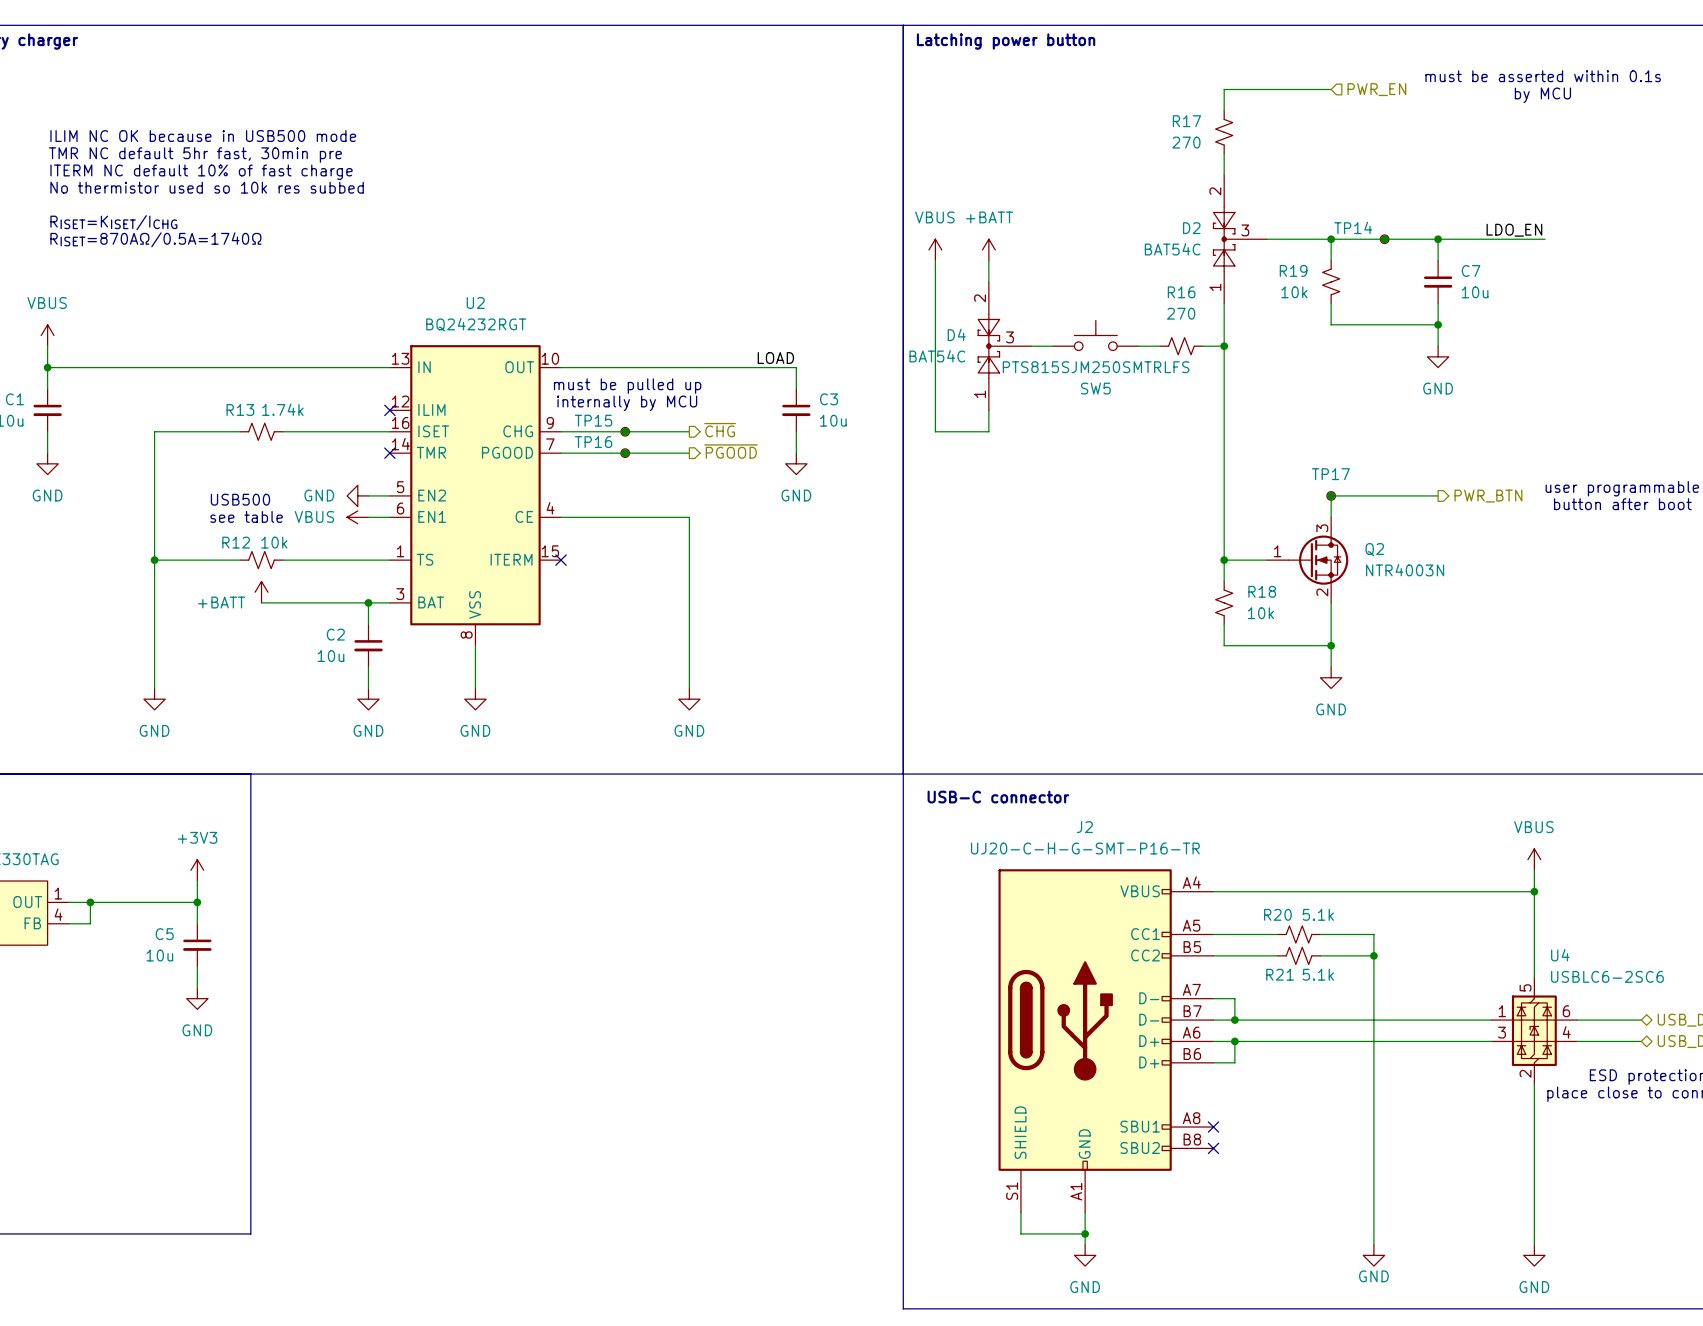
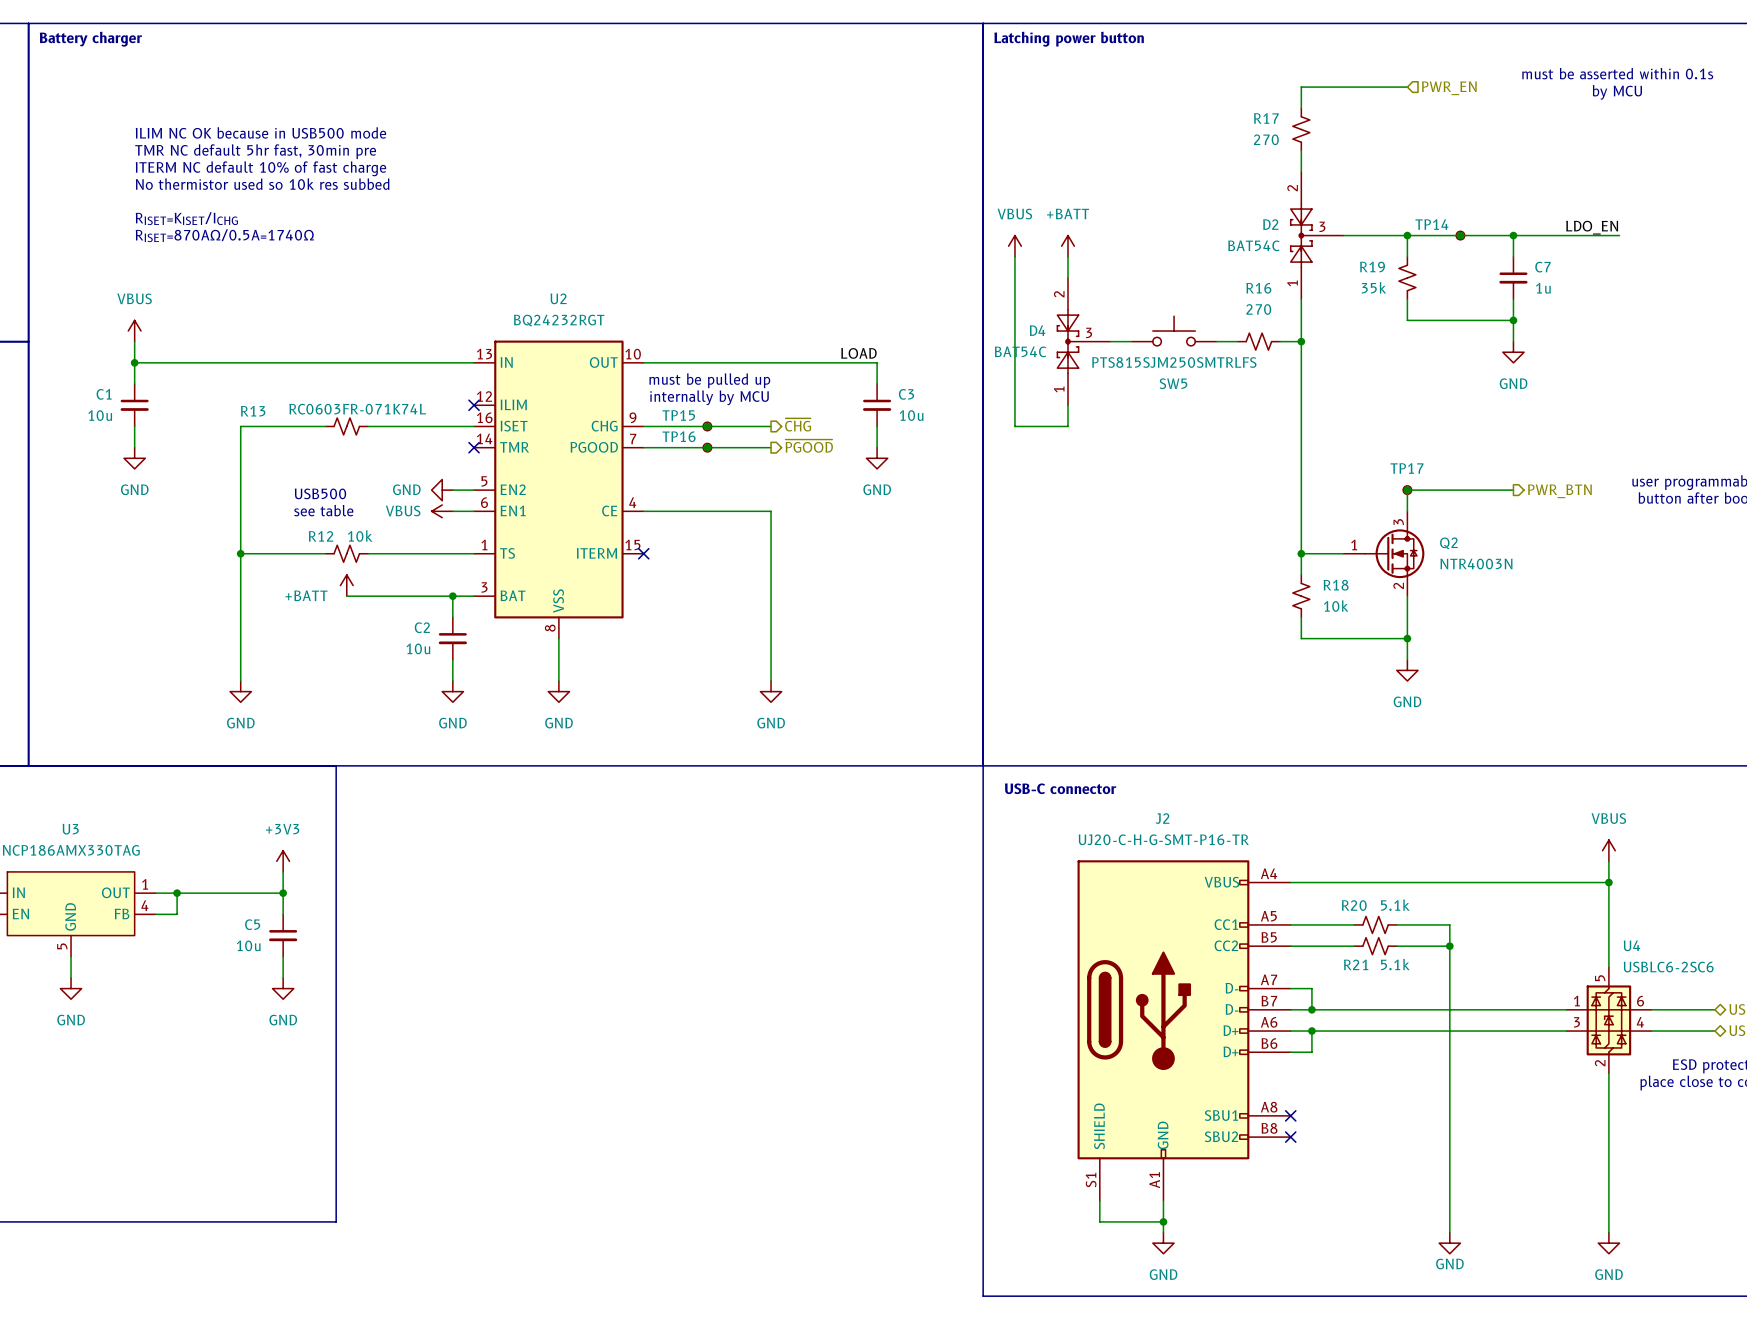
R19 value: 10k (1294, 292) -> 35k (1373, 287)
C7 value: 10u (1475, 292) -> 1u (1543, 288)
R13 name position: R13 (240, 409) -> R13 (253, 411)
R13 value: 1.74k (282, 409) -> RC0603FR-071K74L (357, 409)

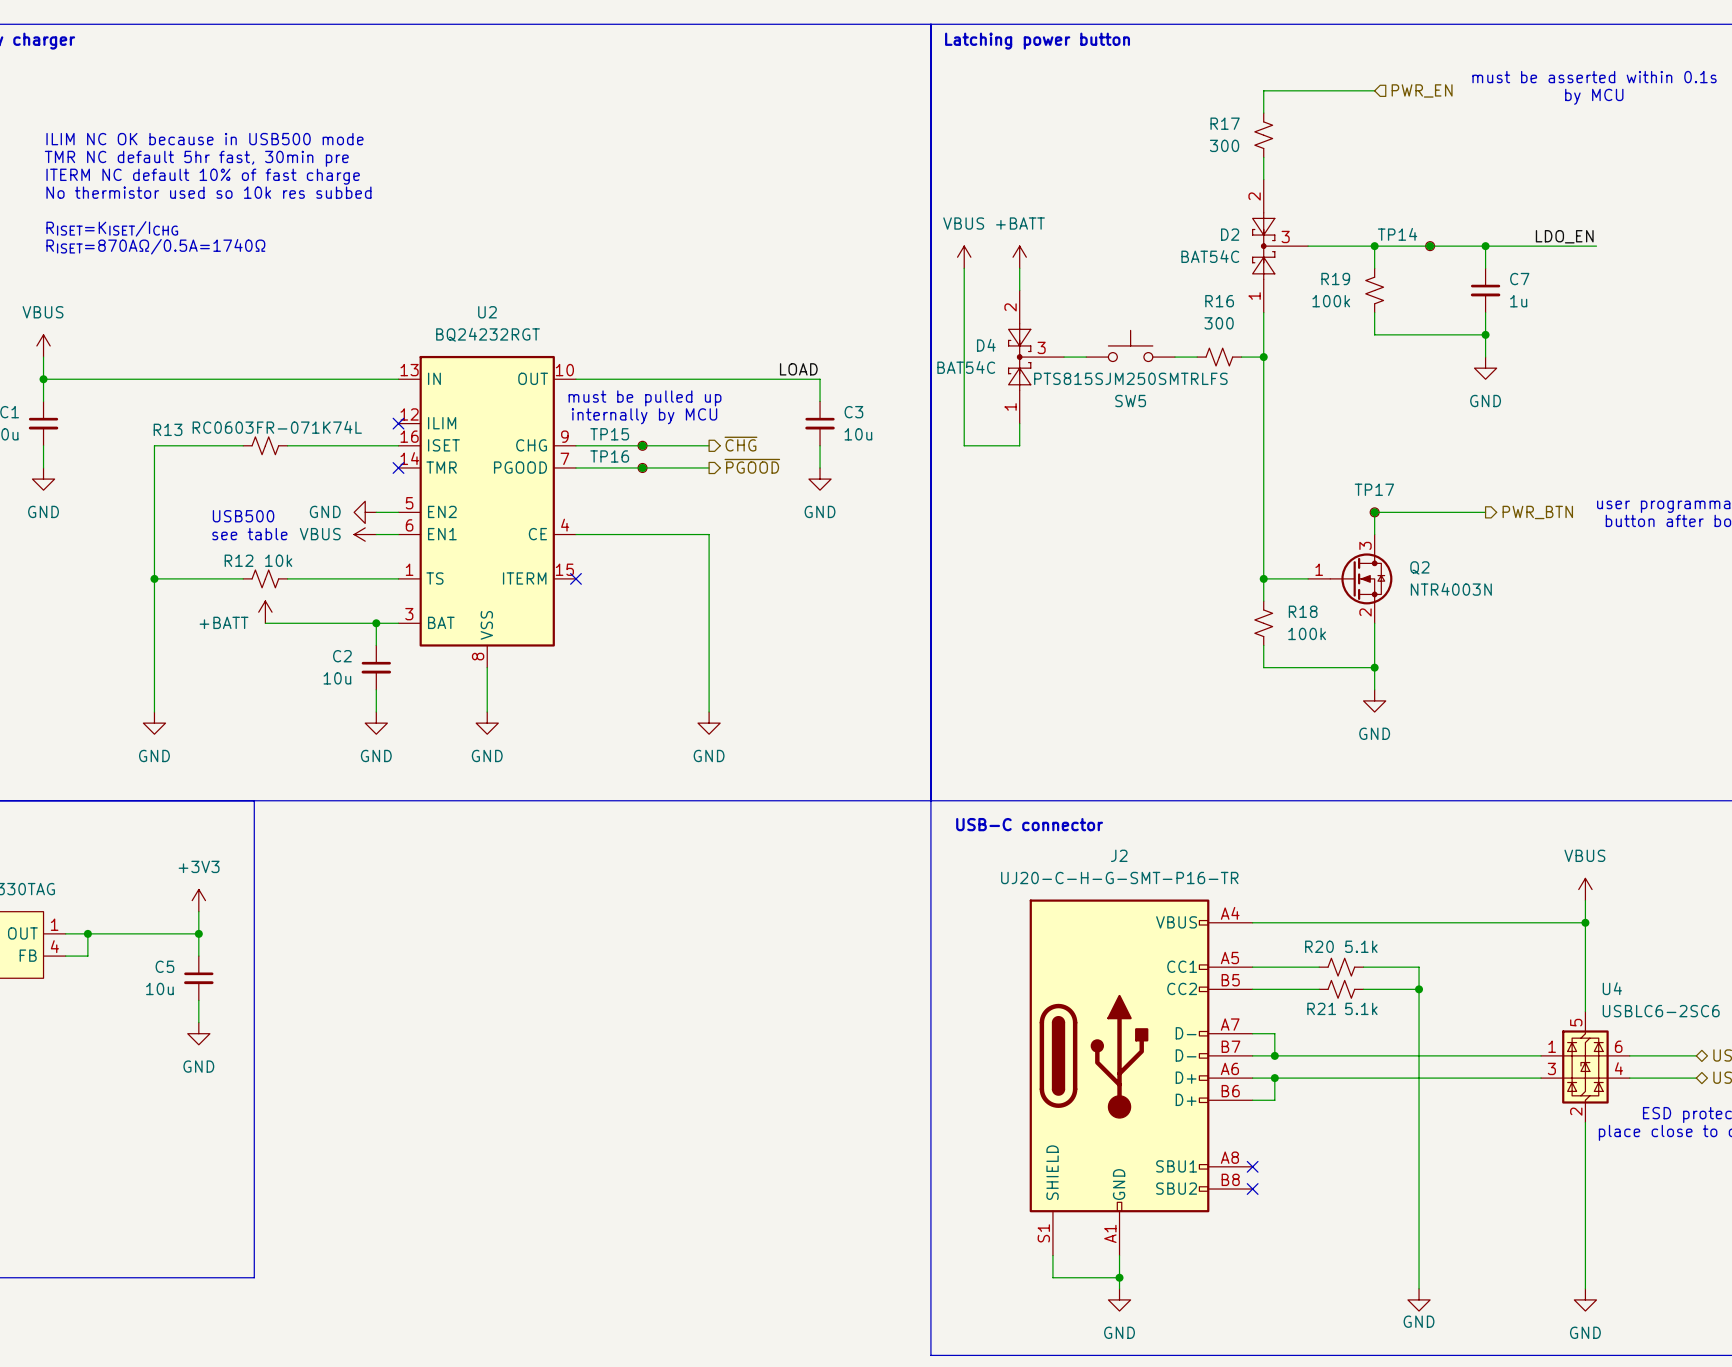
R17 value: 270 (1266, 139) -> 300 (1224, 145)
R19 value: 35k (1373, 287) -> 100k (1331, 301)
R16 value: 270 (1258, 309) -> 300 (1219, 323)
R18 value: 10k (1336, 606) -> 100k (1307, 633)

